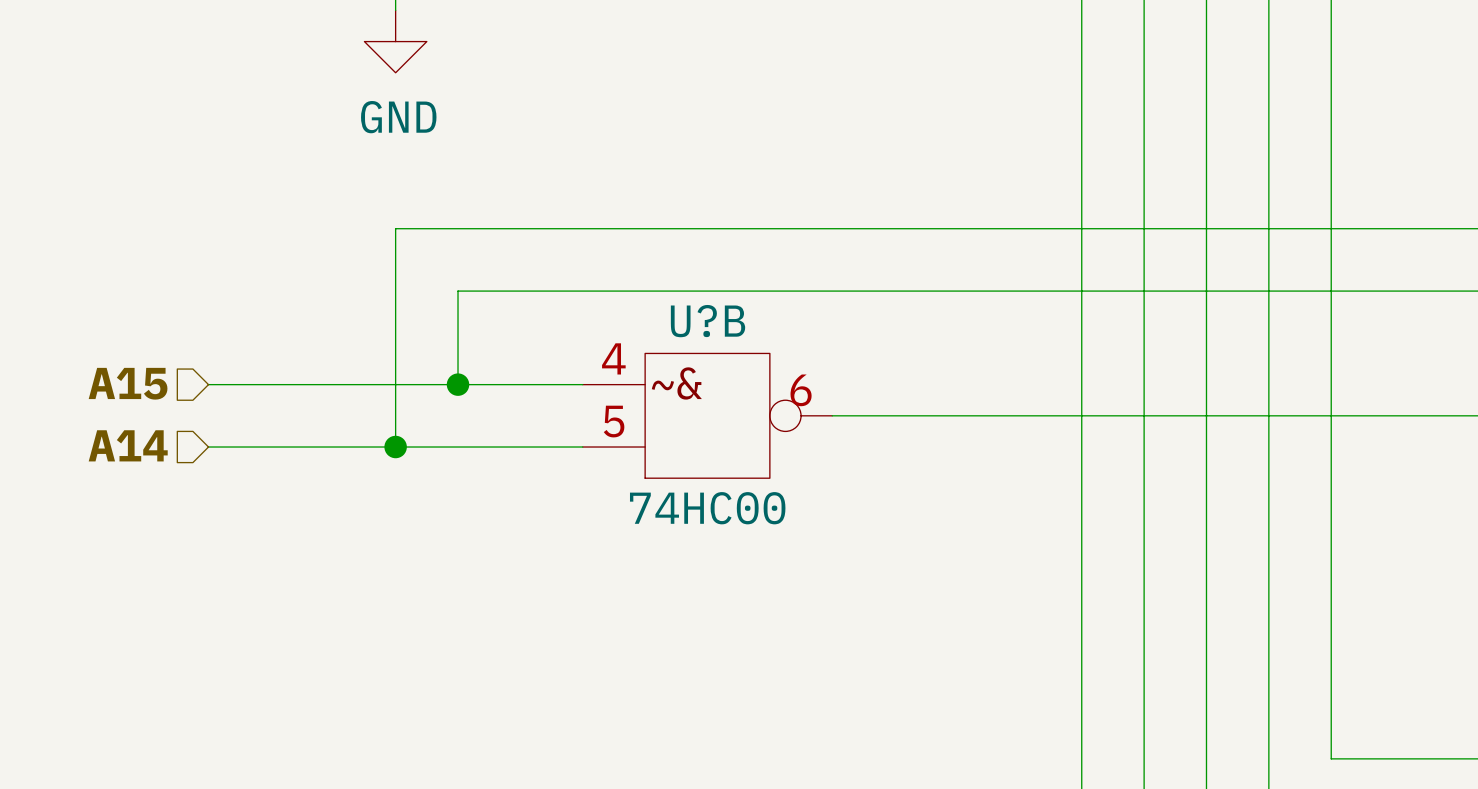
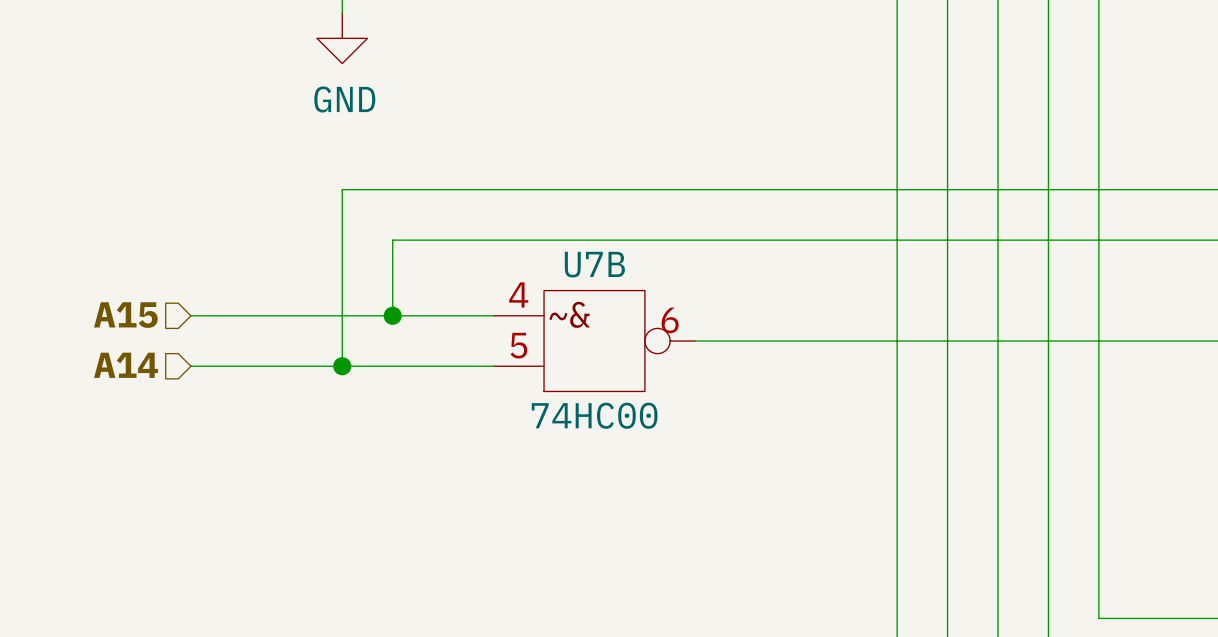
U?B name: U?B (708, 321) -> U7B (594, 264)

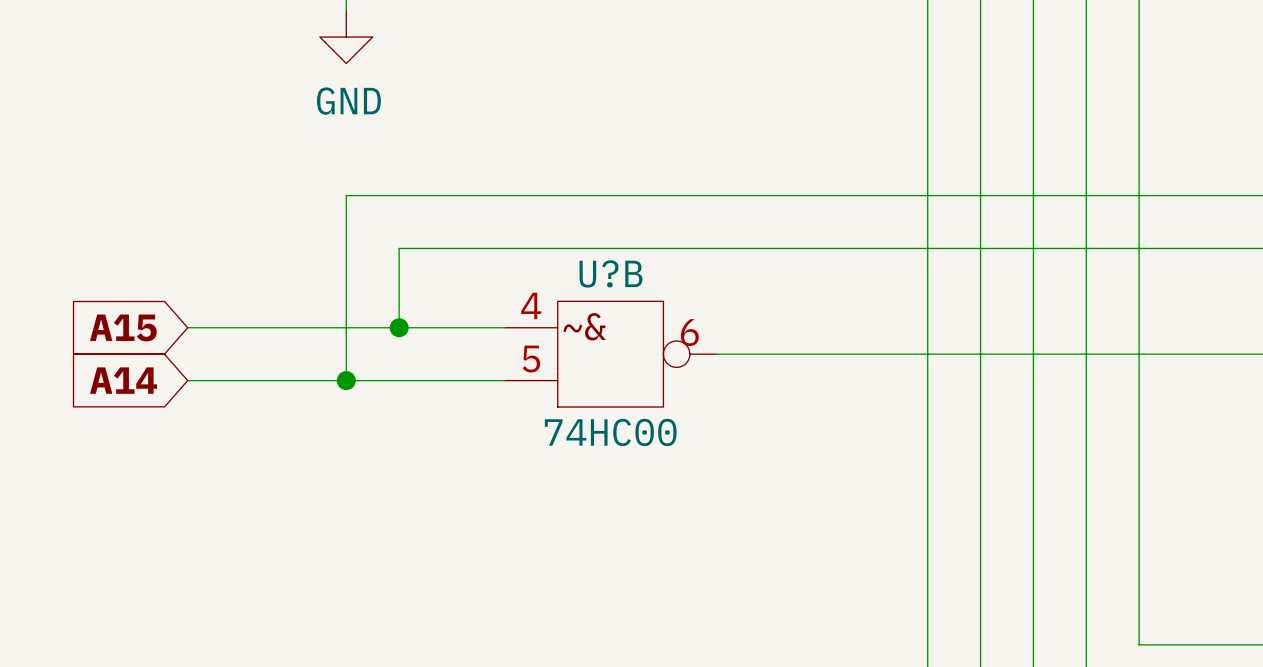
U7B name: U7B (594, 264) -> U?B (611, 273)
hierarchical label: A15 (125, 315) -> none
global label: none -> A15 (123, 327)
hierarchical label: A14 (125, 365) -> none
global label: none -> A14 (123, 380)

